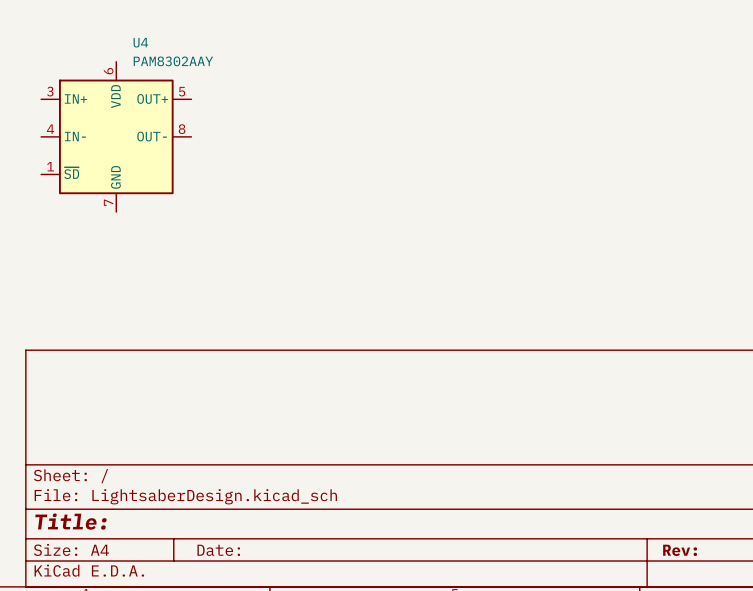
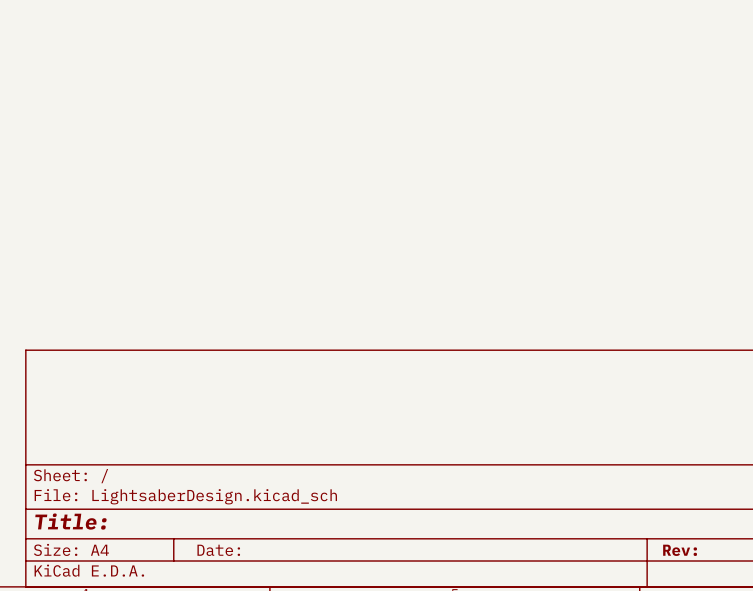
U4: PAM8302AAY (116, 136) -> none

